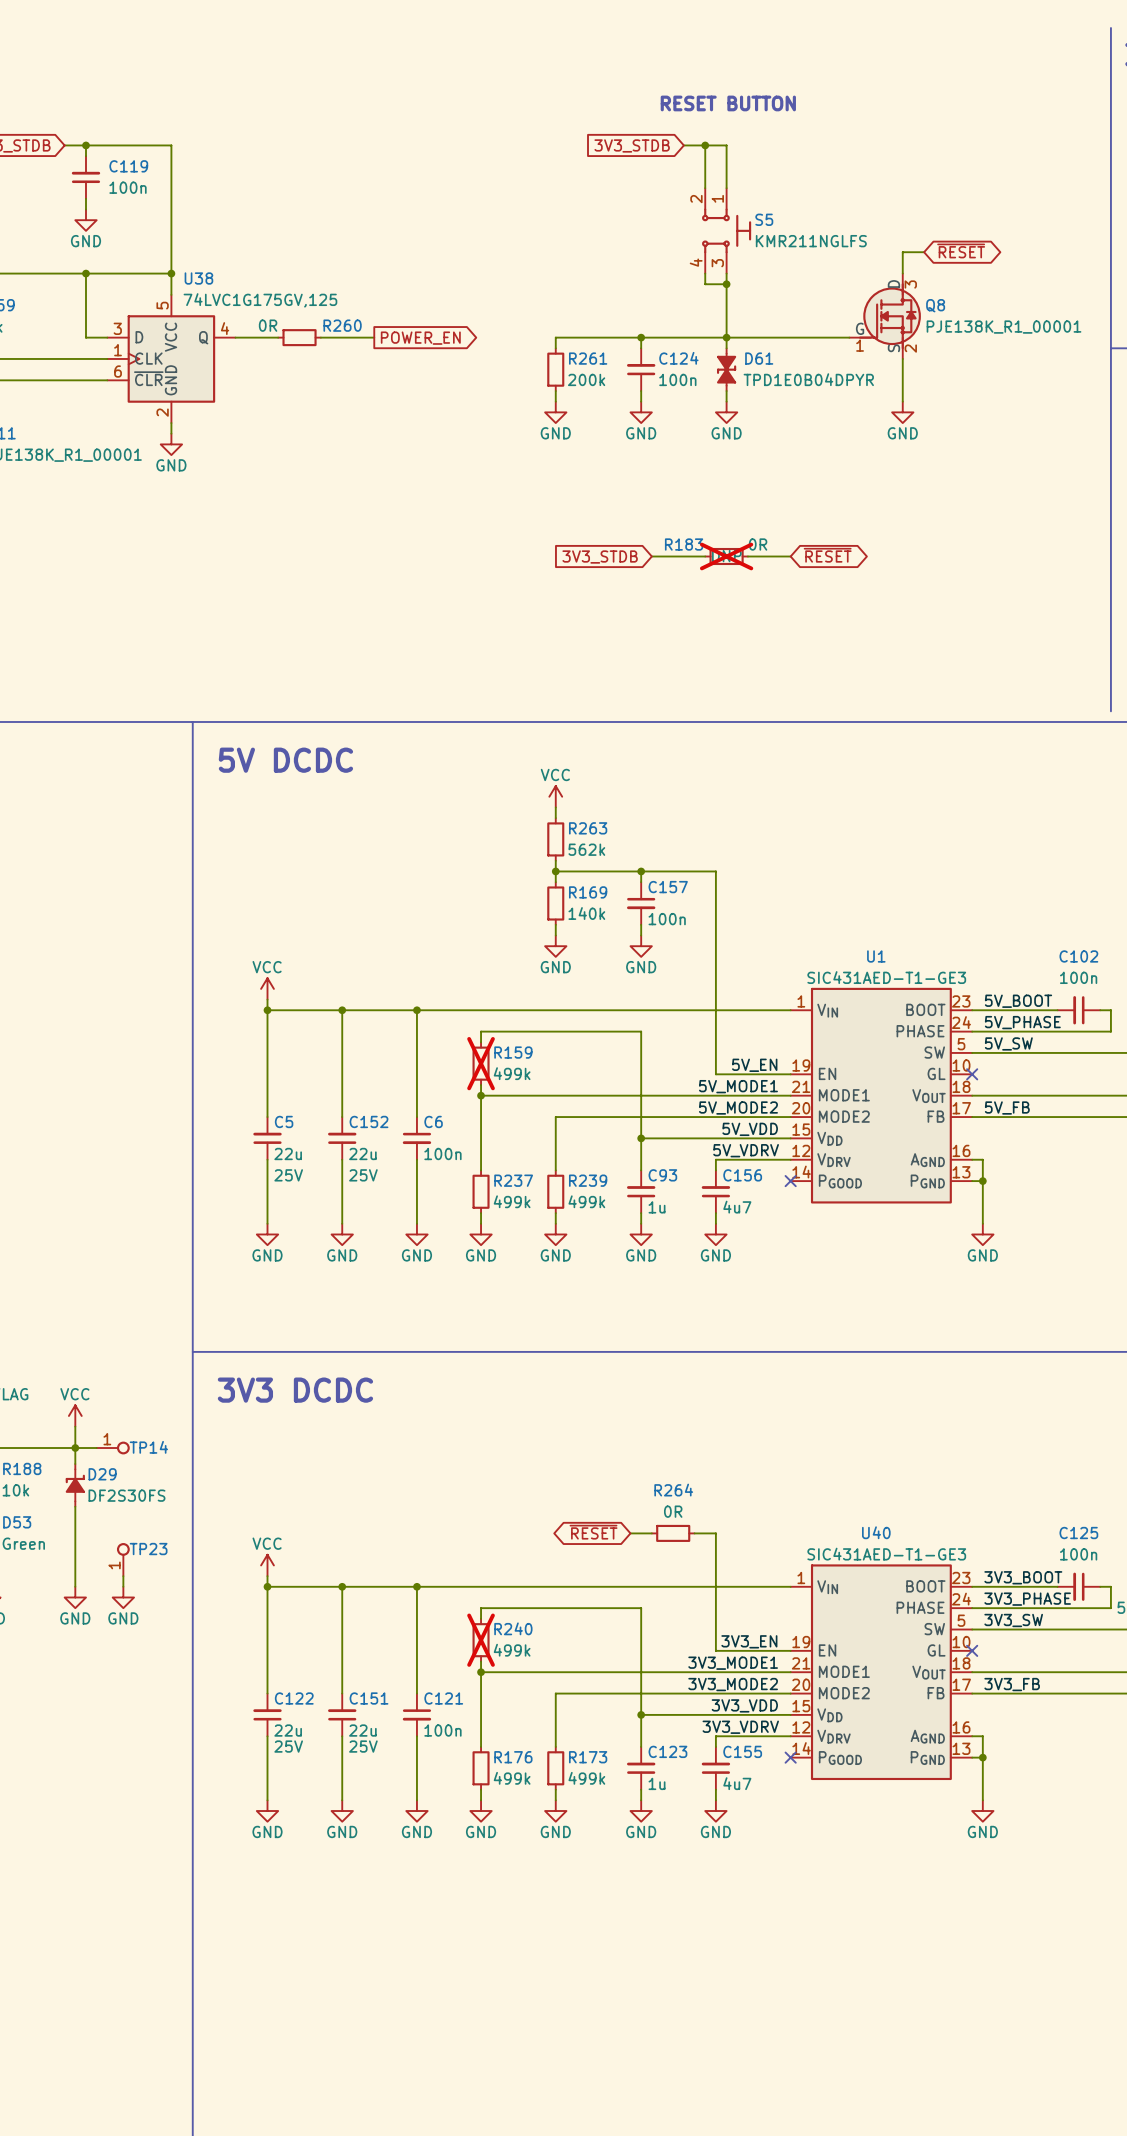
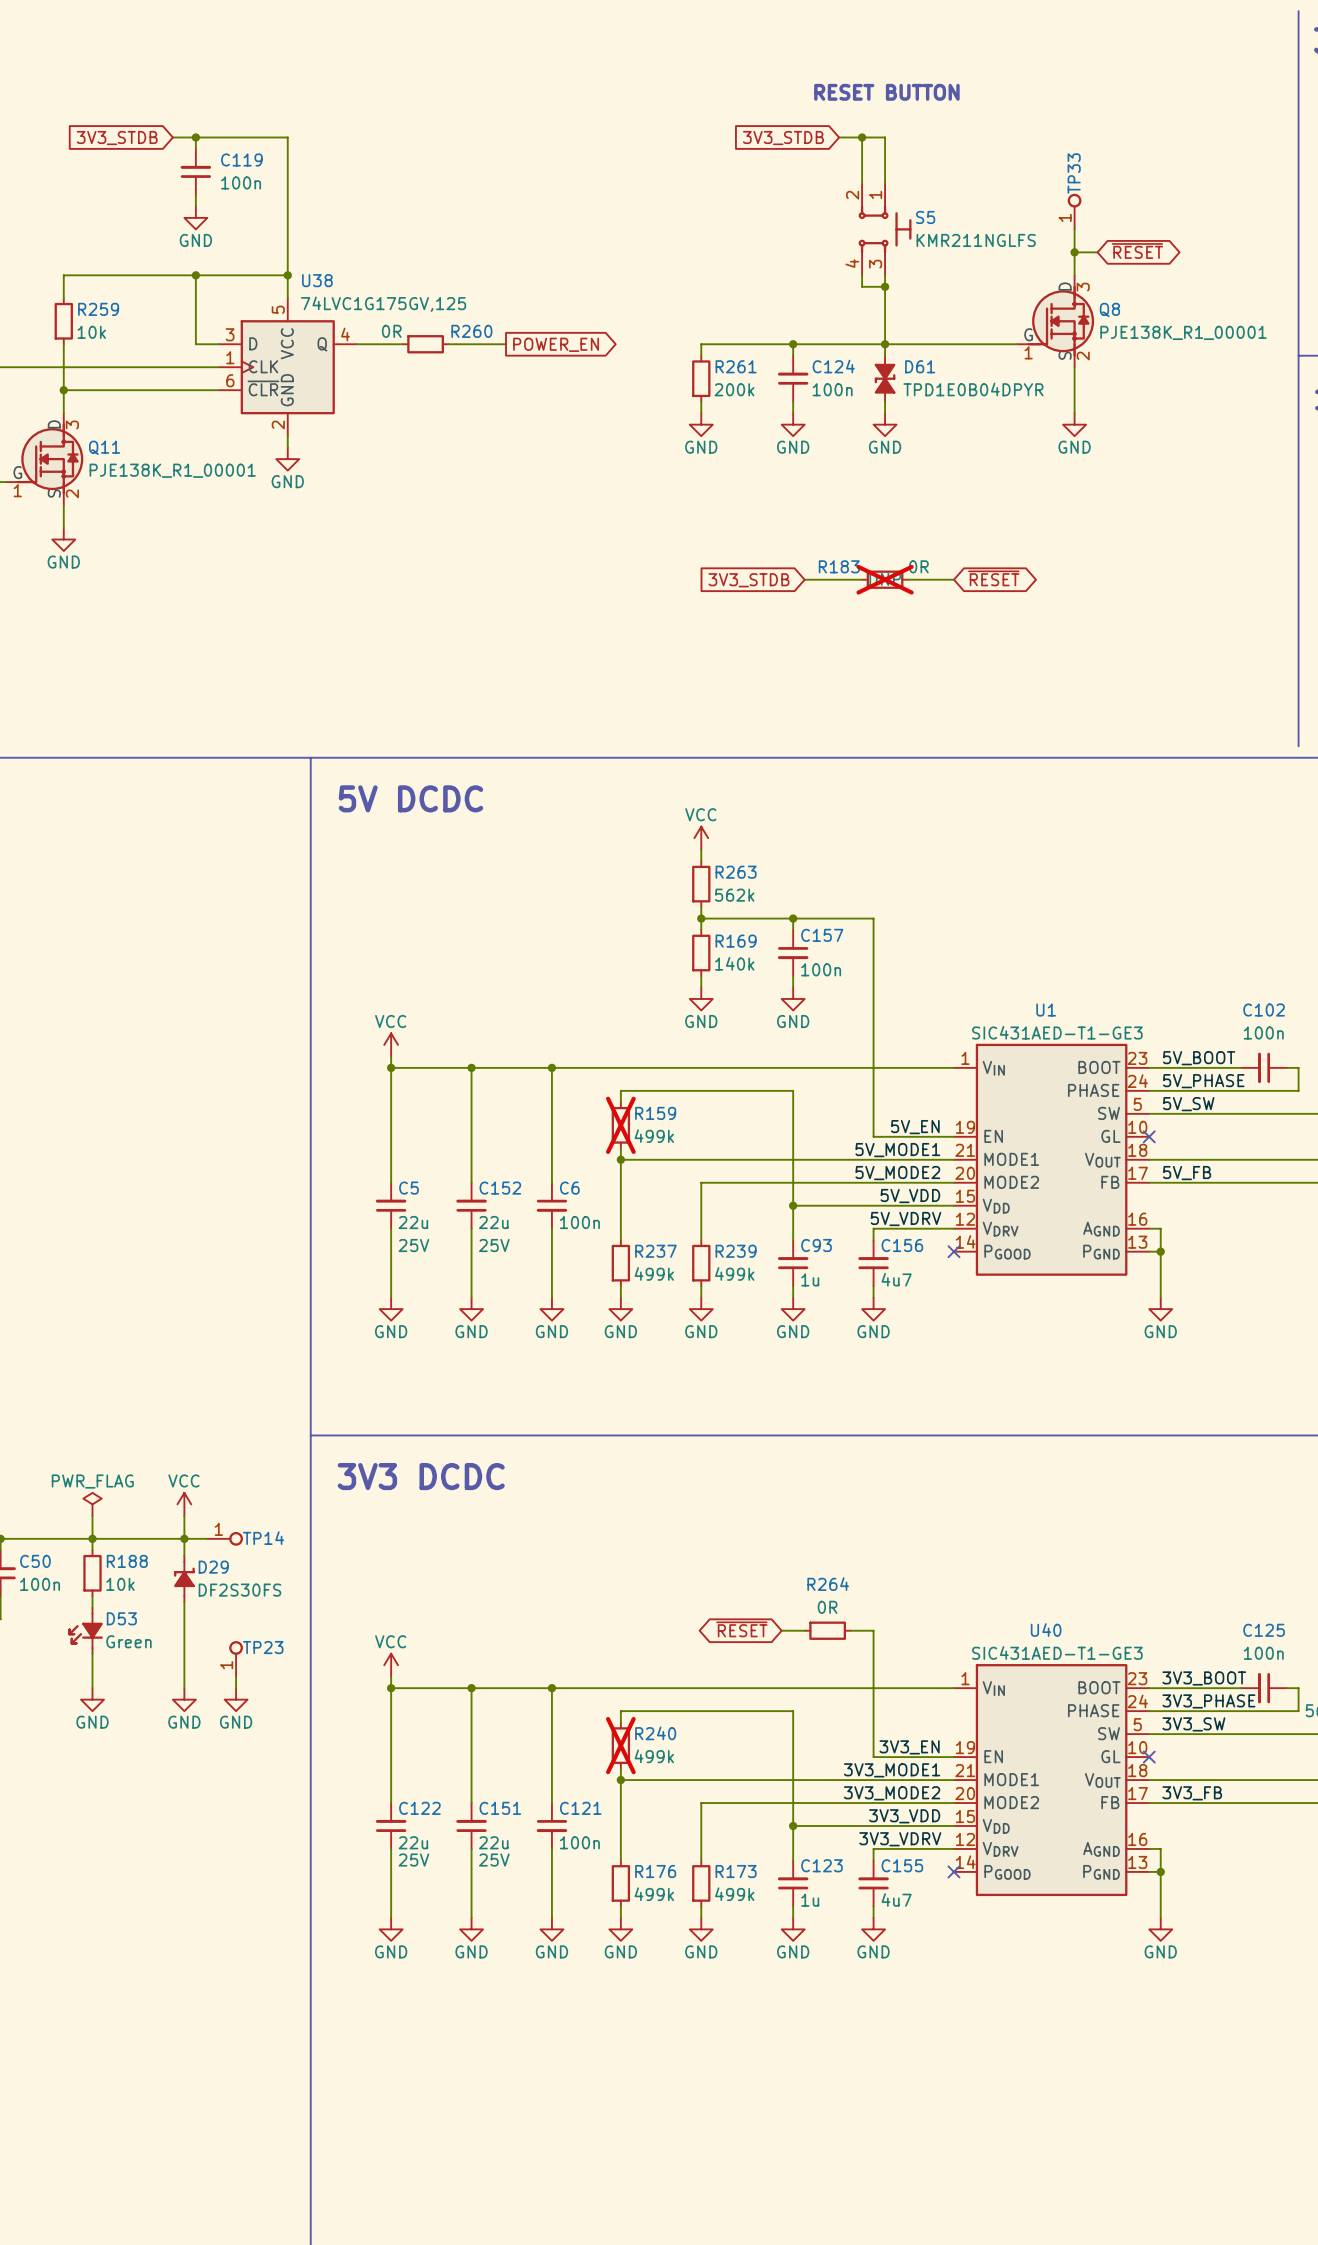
TP33: none -> (1074, 211)
wire: none -> (1074, 229) (1074, 252)
junction: none -> (1074, 252)

